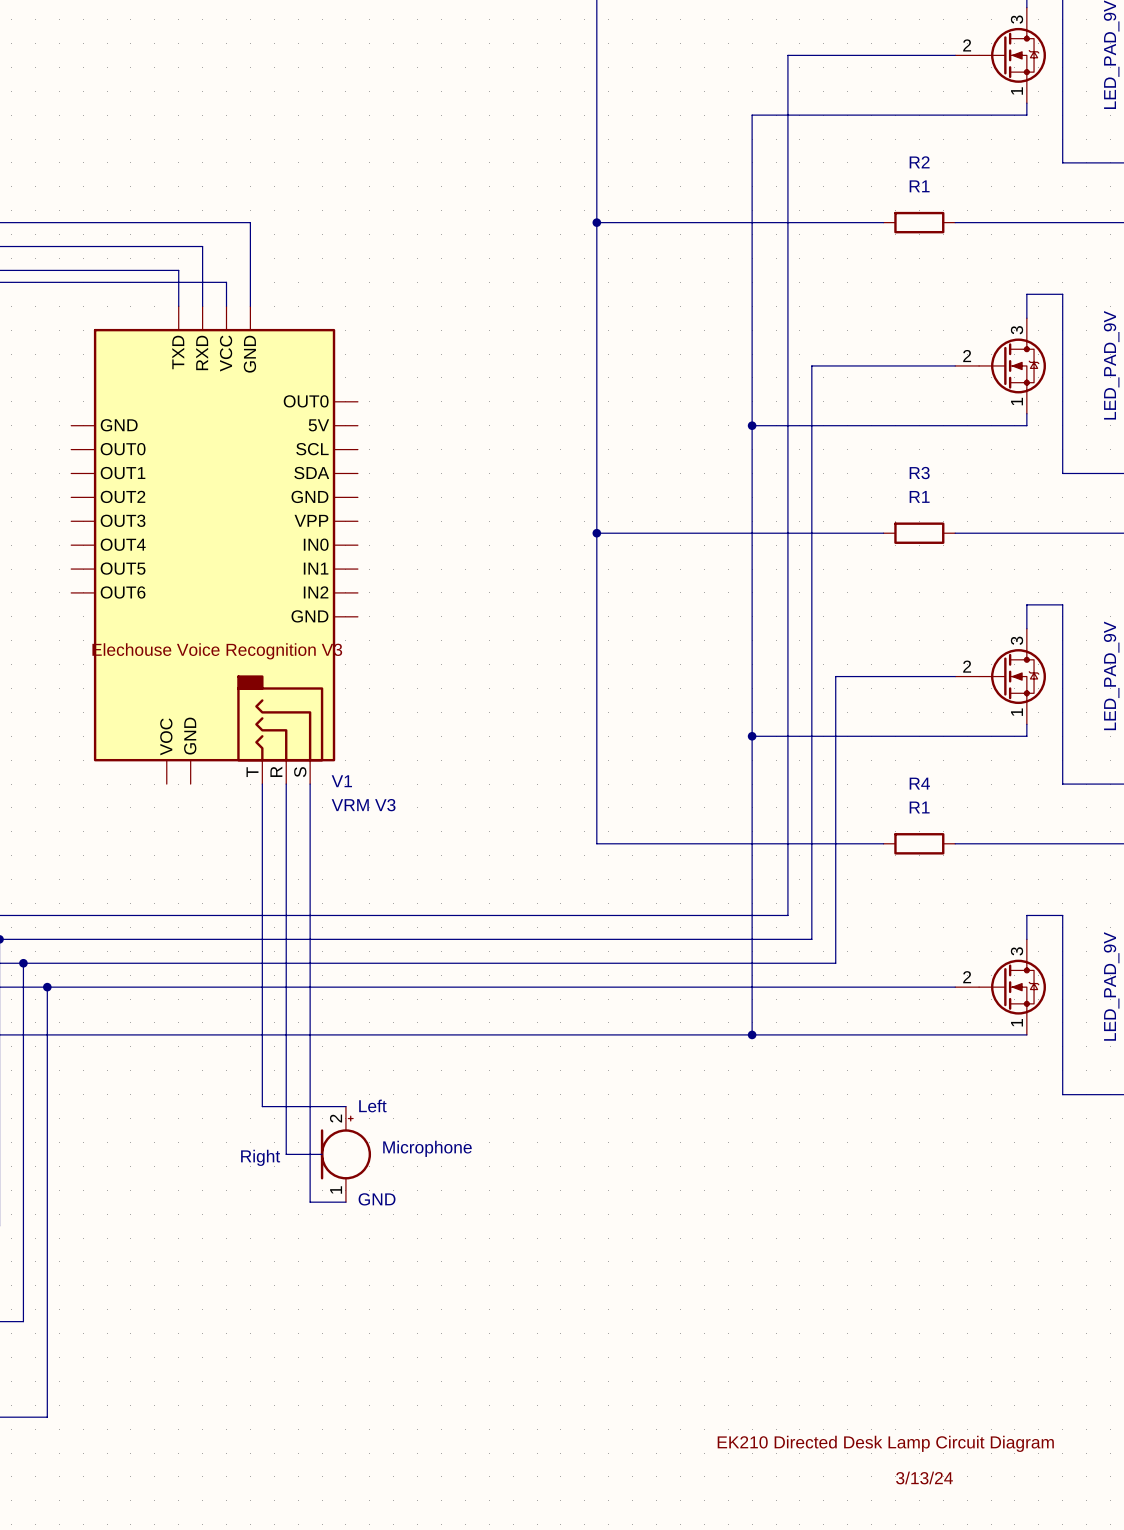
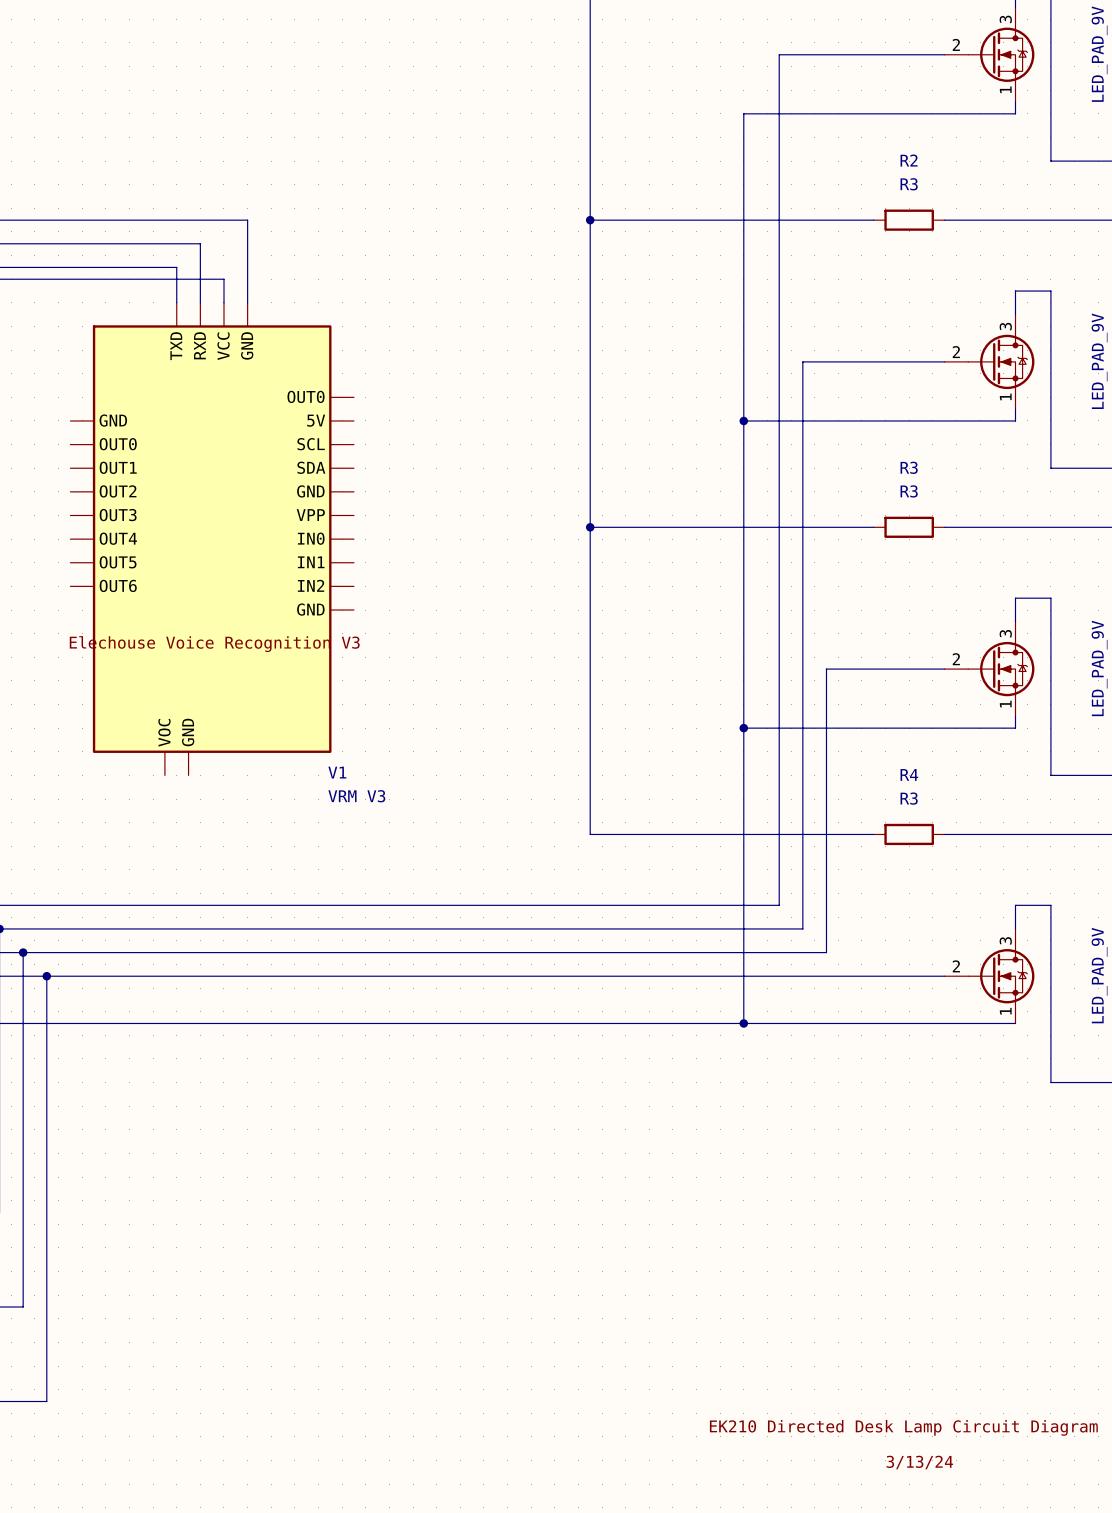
R2 value: R1 (919, 186) -> R3 (909, 184)
V1 symbol: [71, 306, 358, 785] -> [70, 302, 354, 776]
R3 value: R1 (919, 496) -> R3 (909, 491)
wire: (262, 784) (262, 1106) (345, 1106) -> none
wire: (286, 784) (286, 1154) (322, 1154) -> none
wire: (310, 784) (310, 1202) (345, 1202) -> none
R4 value: R1 (919, 807) -> R3 (909, 798)
text: Left (372, 1105) -> none
part: Microphone (345, 1154) -> none
text: Right (260, 1157) -> none
text: GND (377, 1199) -> none

